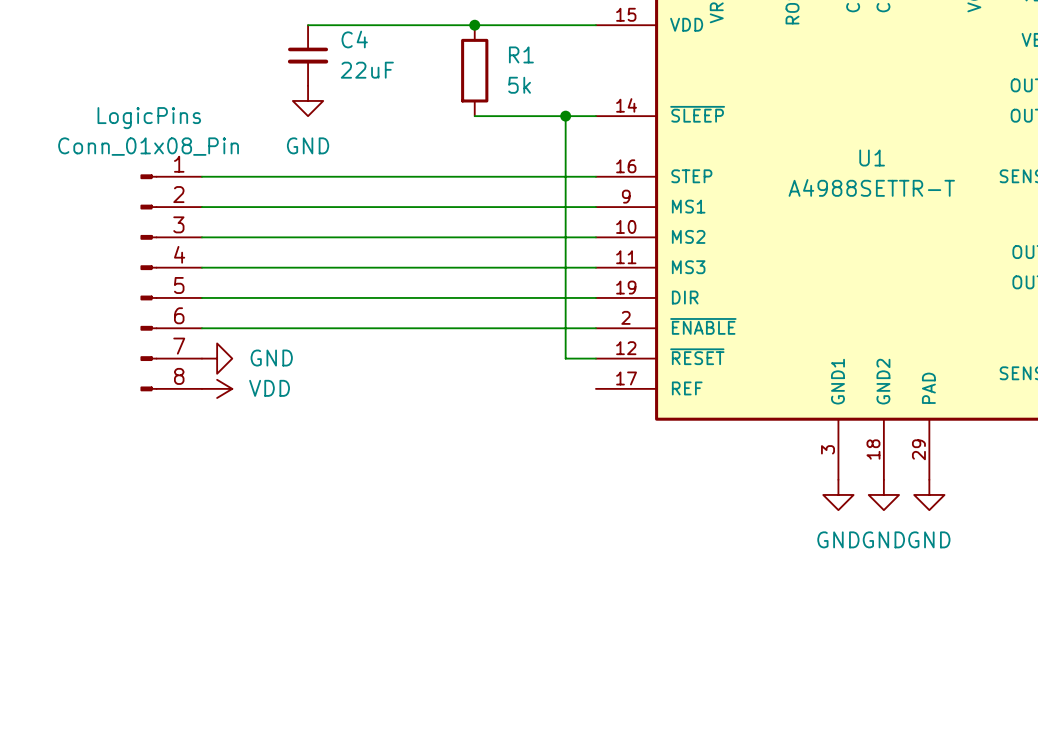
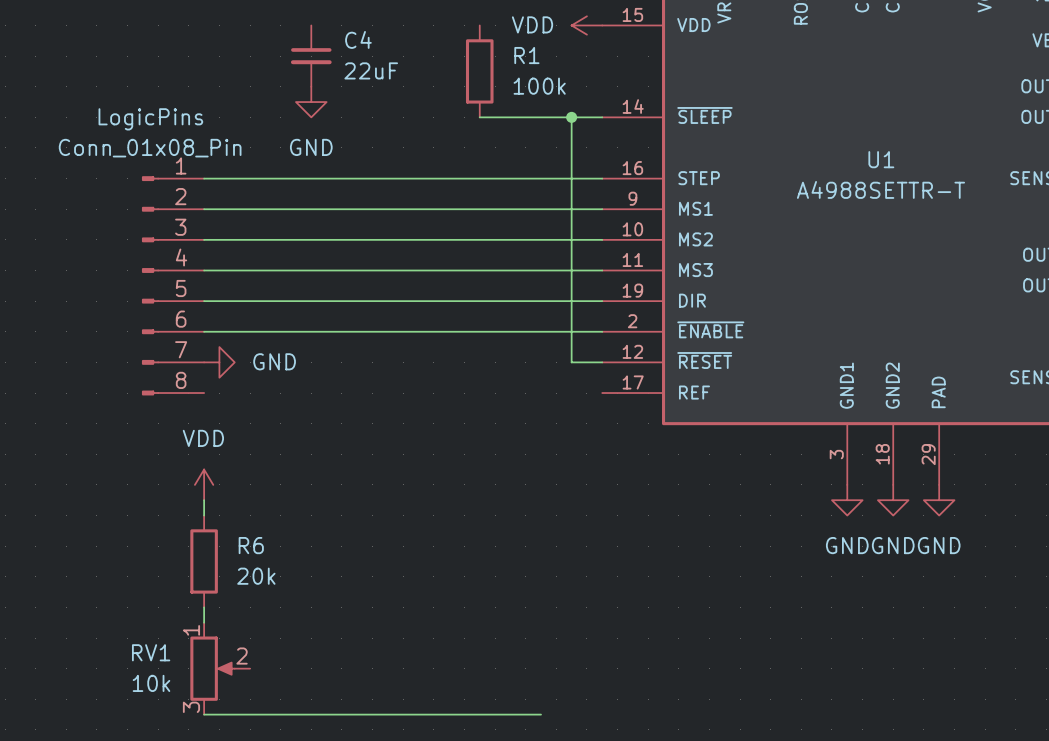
wire: (308, 25) (595, 25) -> none
junction: (474, 25) -> none
power symbol: none -> VDD (586, 25)
R1 value: 5k (519, 85) -> 100k (539, 86)
power symbol rotation: 0° (217, 388) -> 90° counterclockwise (204, 484)
power symbol position: VDD (217, 388) -> VDD (204, 484)
wire: none -> (204, 500) (204, 515)
R6: none -> 20k (204, 561)
wire: none -> (204, 607) (204, 622)
RV1: none -> 10k (220, 668)
wire: none -> (204, 714) (541, 714)

